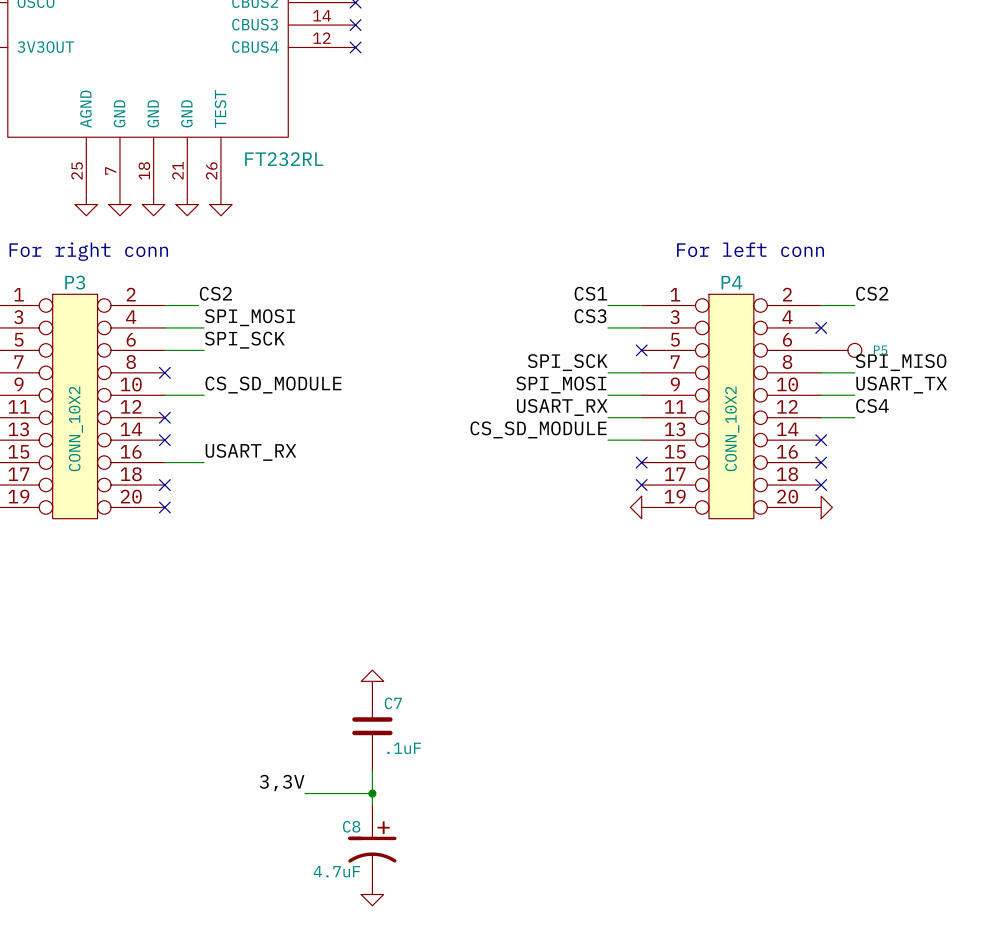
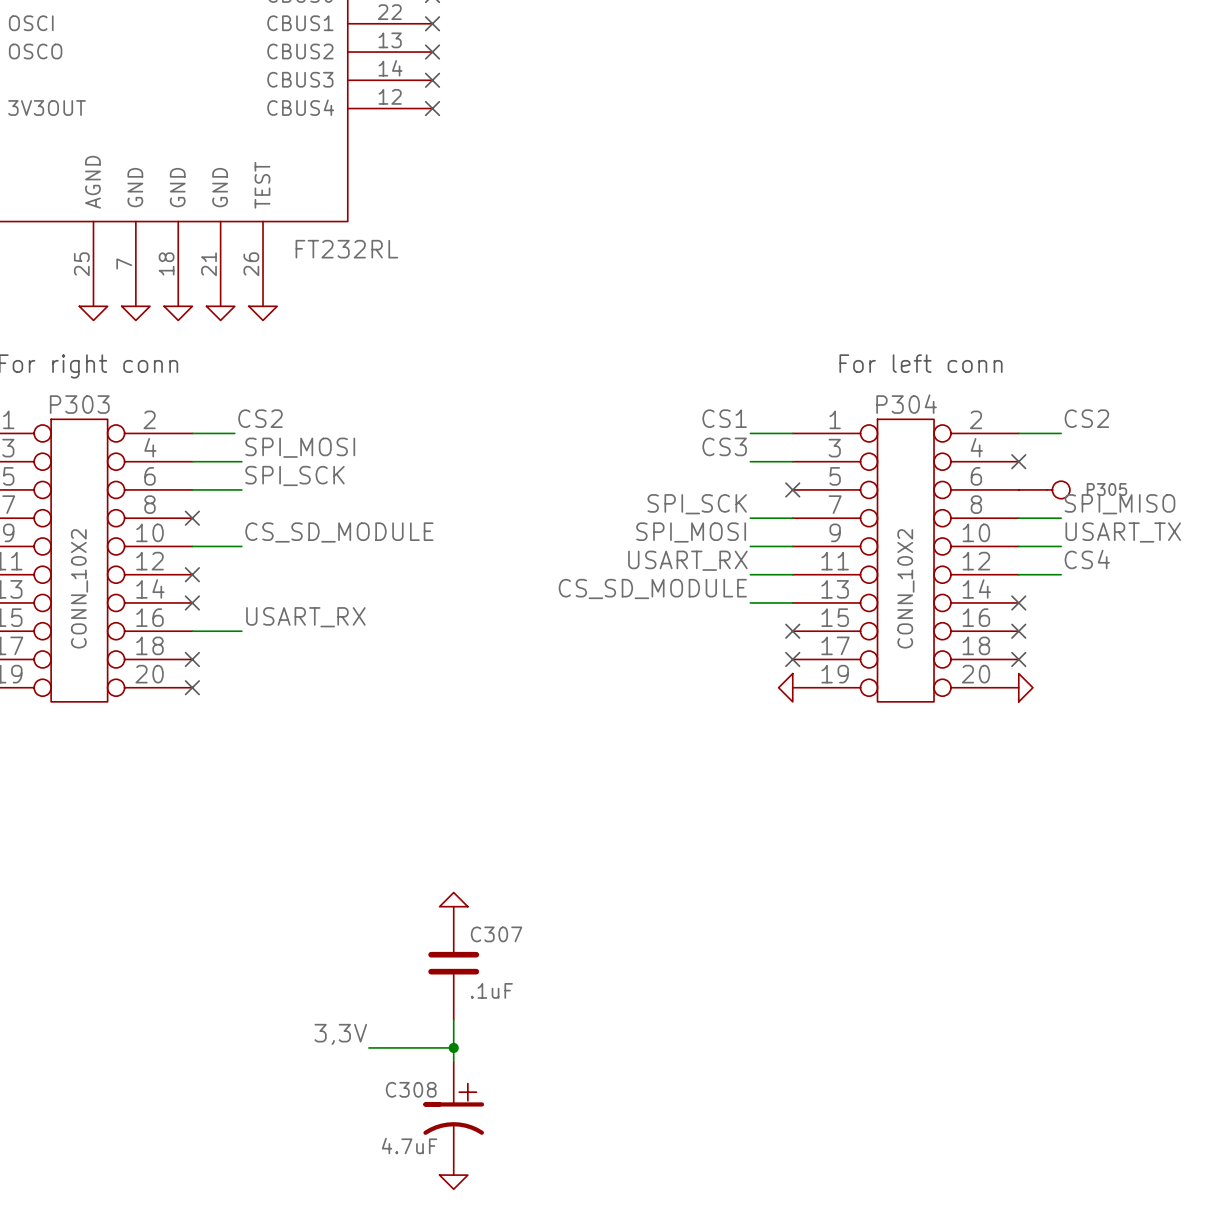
P3 name: P3 (75, 282) -> P303 (79, 404)
P4 name: P4 (731, 282) -> P304 (906, 404)
P5 name: P5 (880, 350) -> P305 (1106, 489)
C7 name: C7 (393, 703) -> C307 (496, 934)
C8 name: C8 (351, 826) -> C308 (411, 1089)

